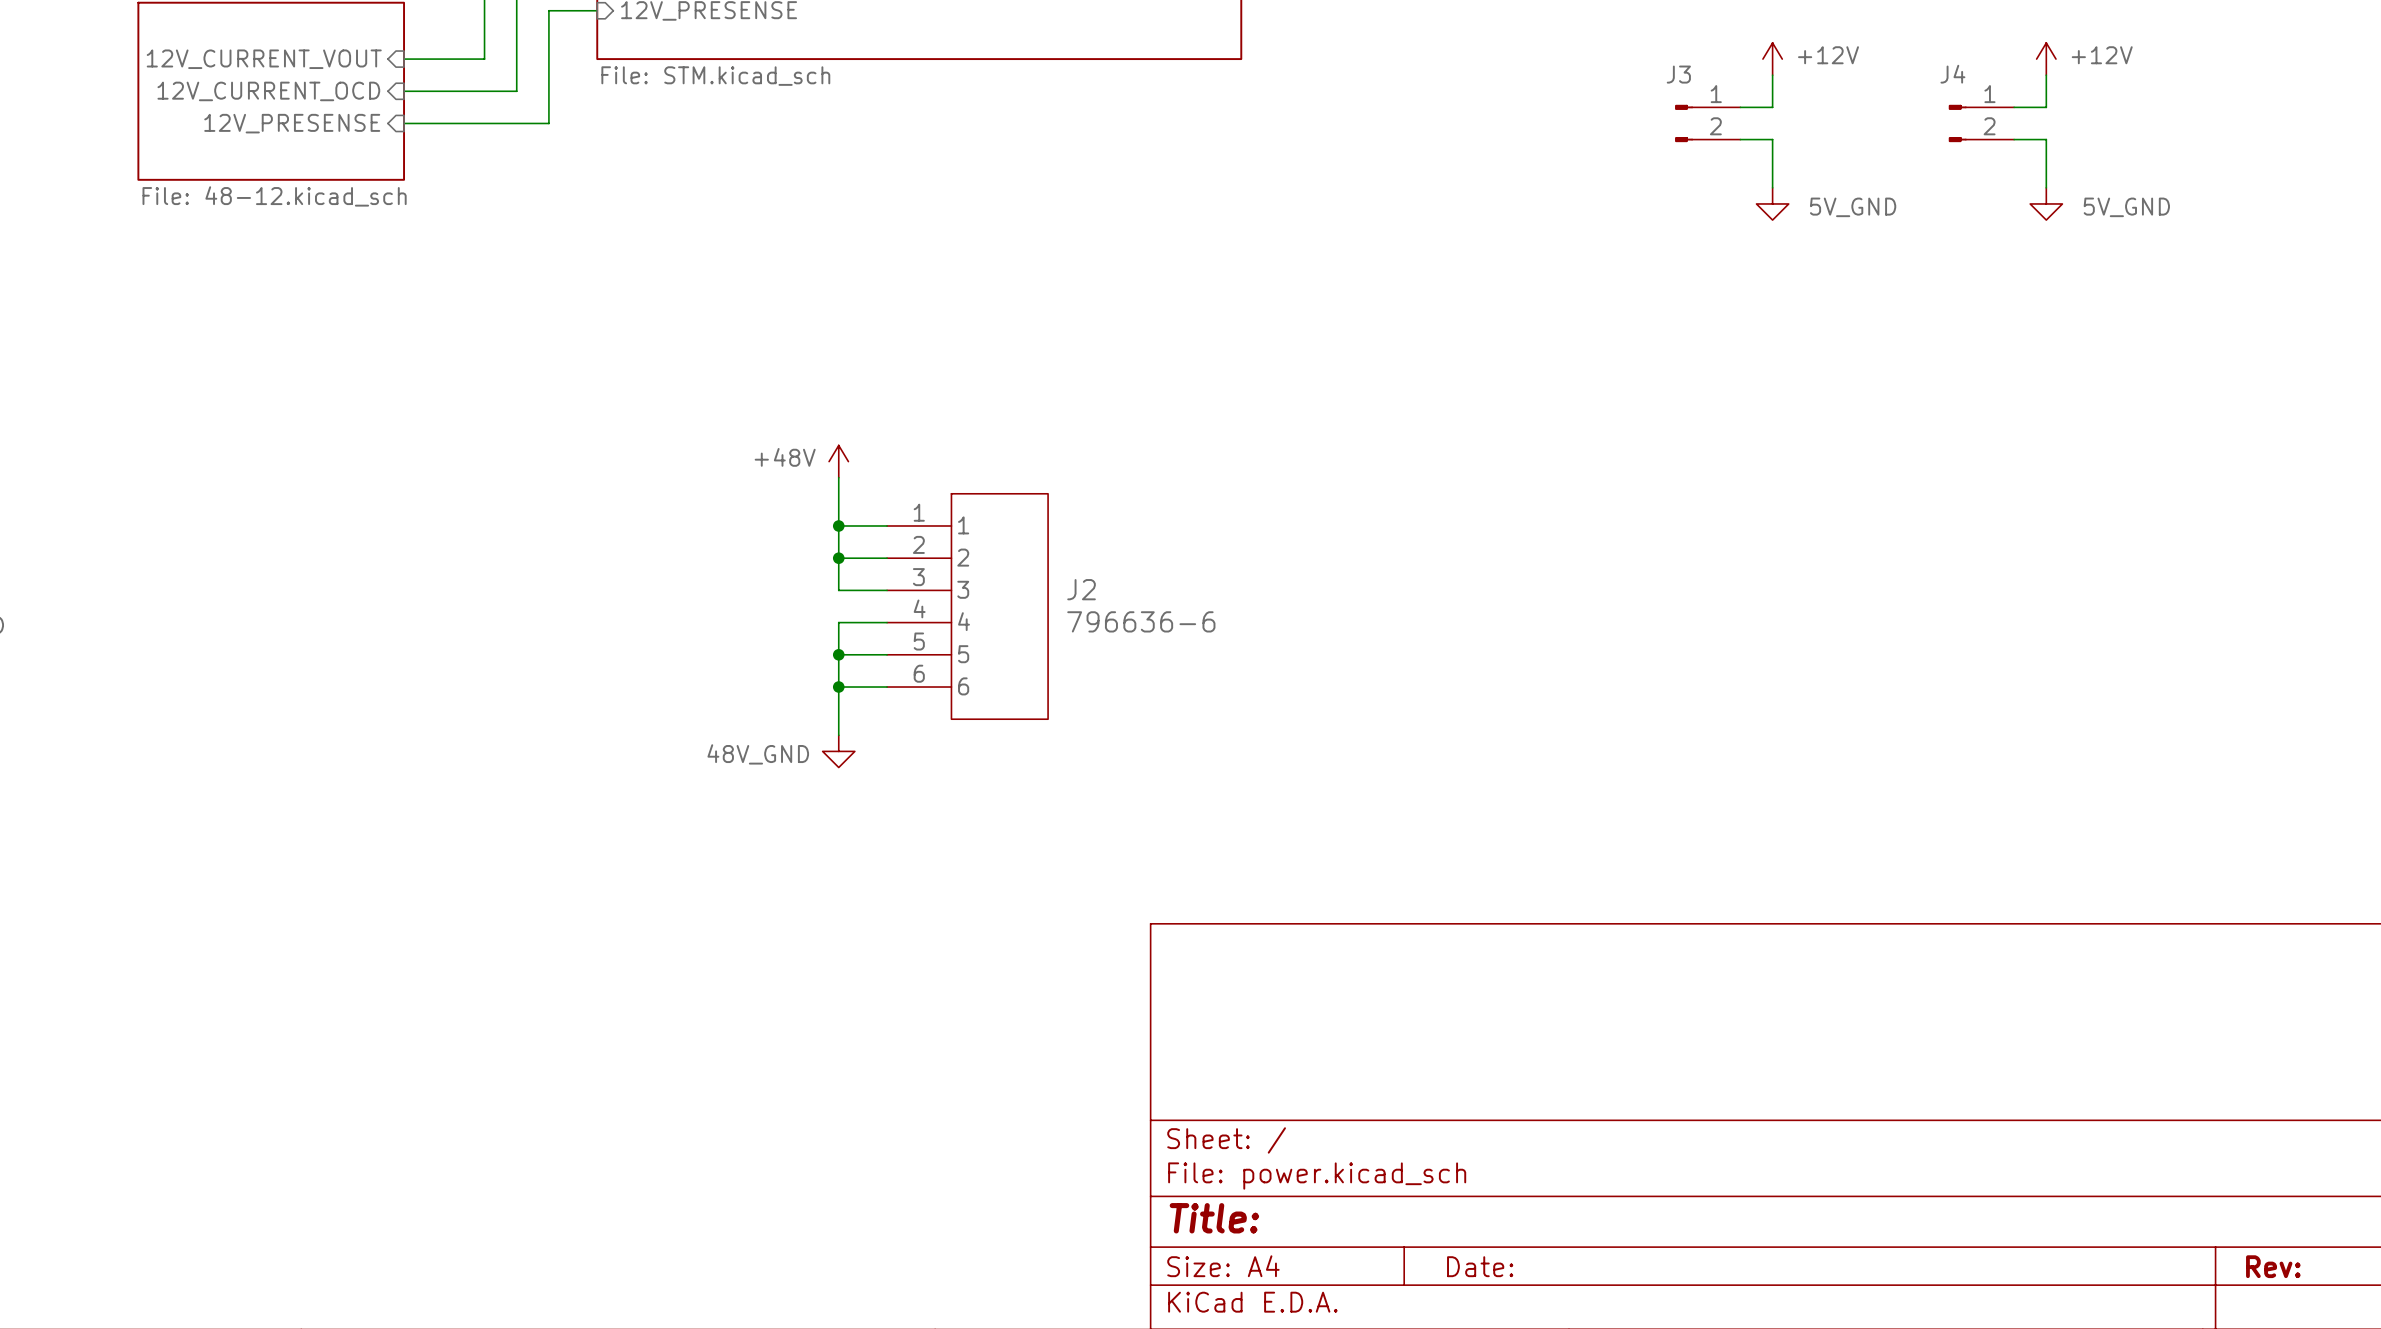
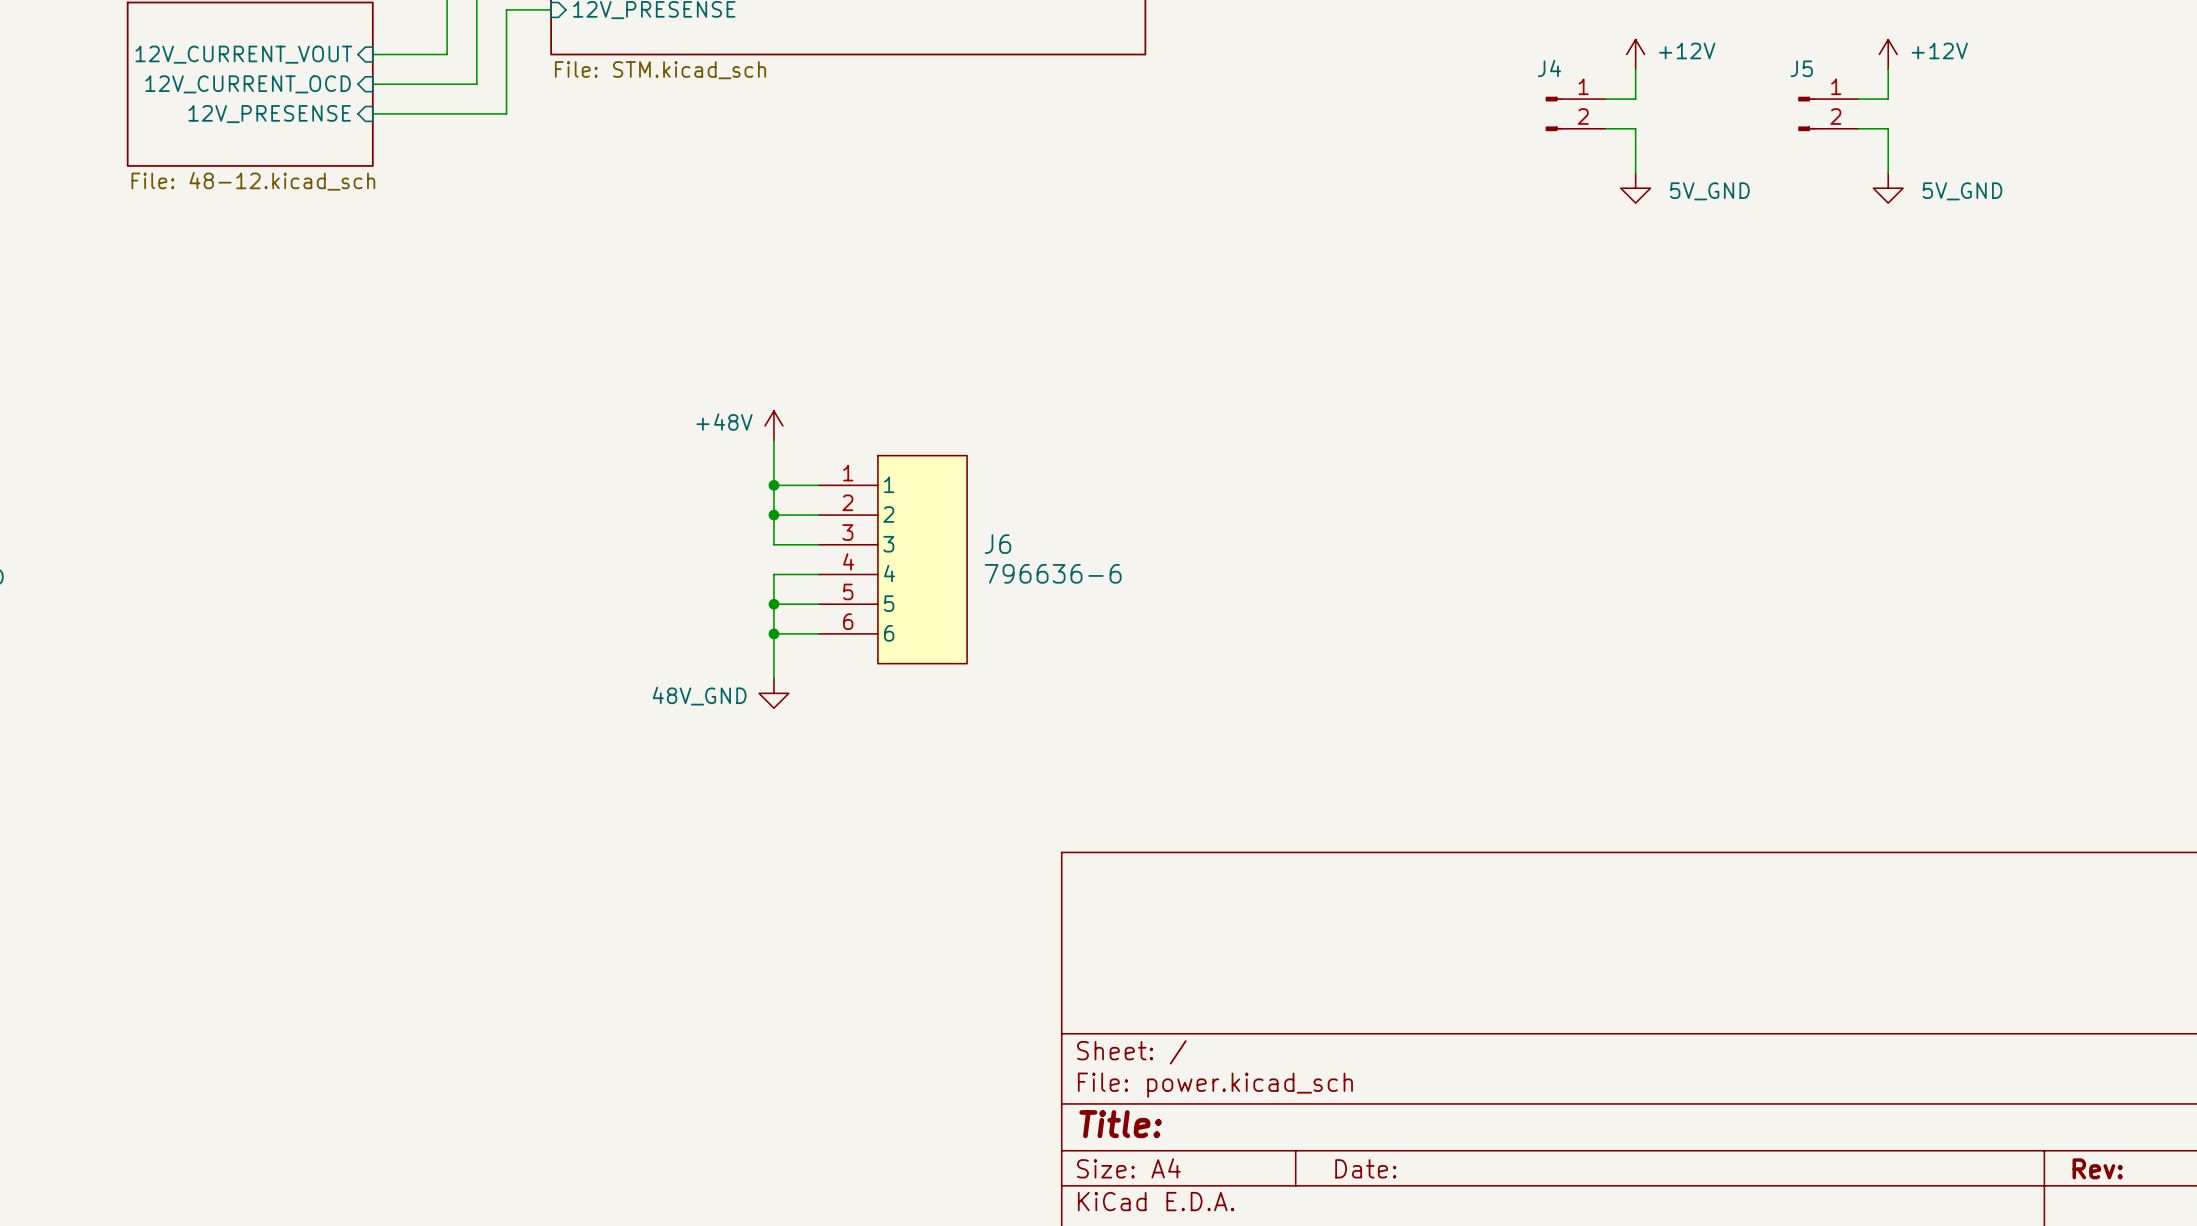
J3 name: J3 (1678, 74) -> J4 (1549, 68)
J4 name: J4 (1952, 74) -> J5 (1801, 68)
J2 name: J2 (1081, 589) -> J6 (997, 544)

